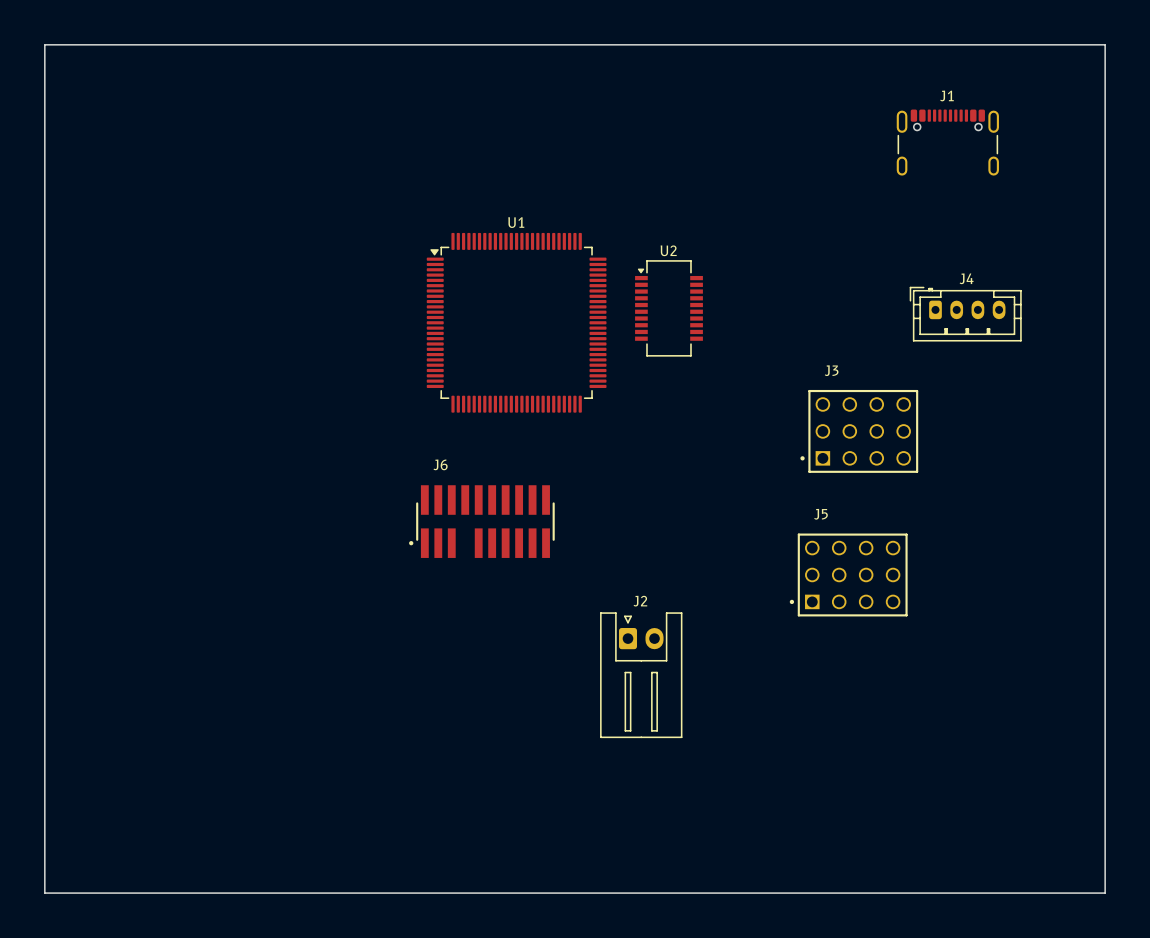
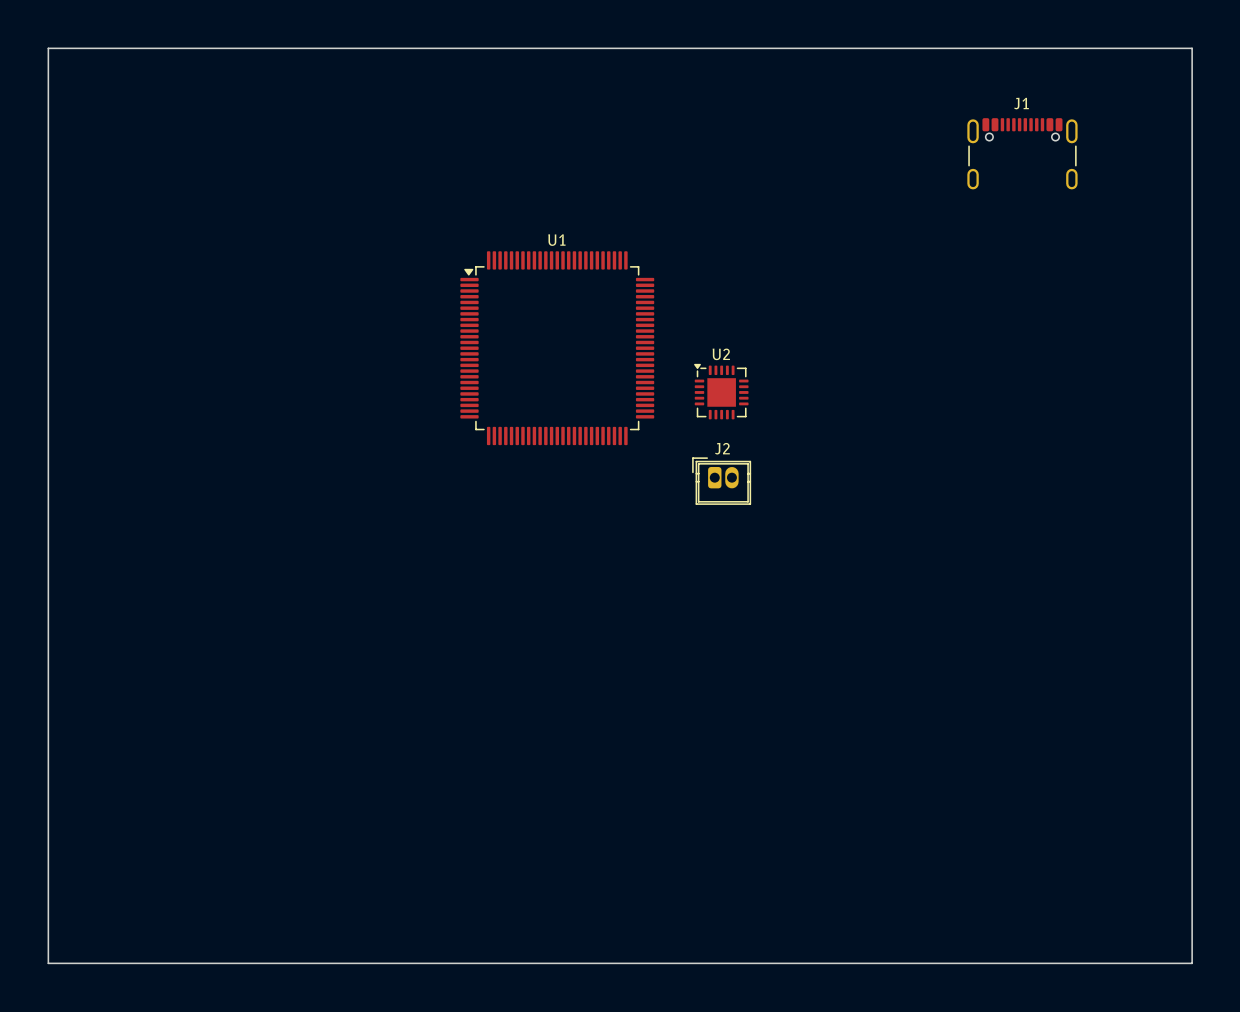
U2 name position: U2 (668, 250) -> U2 (721, 354)
U2 footprint: [635, 260, 703, 357] -> [694, 363, 749, 420]
J4: (965, 314) -> none
J3: (859, 431) -> none
J6: (481, 521) -> none
J5: (848, 574) -> none
J2 name position: J2 (640, 601) -> J2 (722, 448)
J2 footprint: [600, 612, 683, 738] -> [692, 457, 752, 505]

